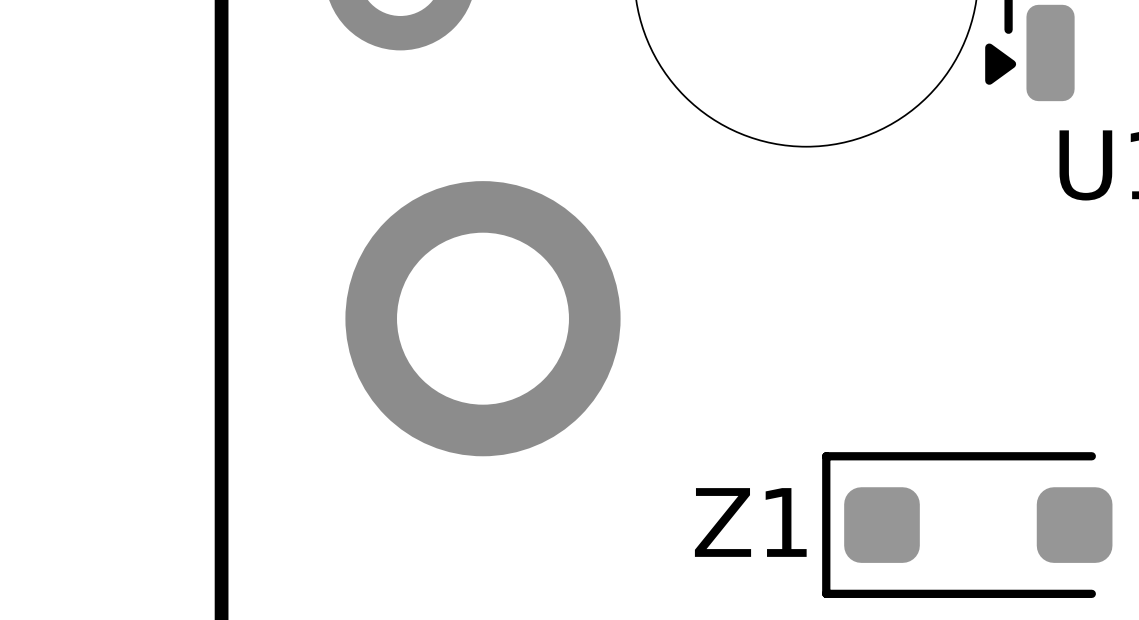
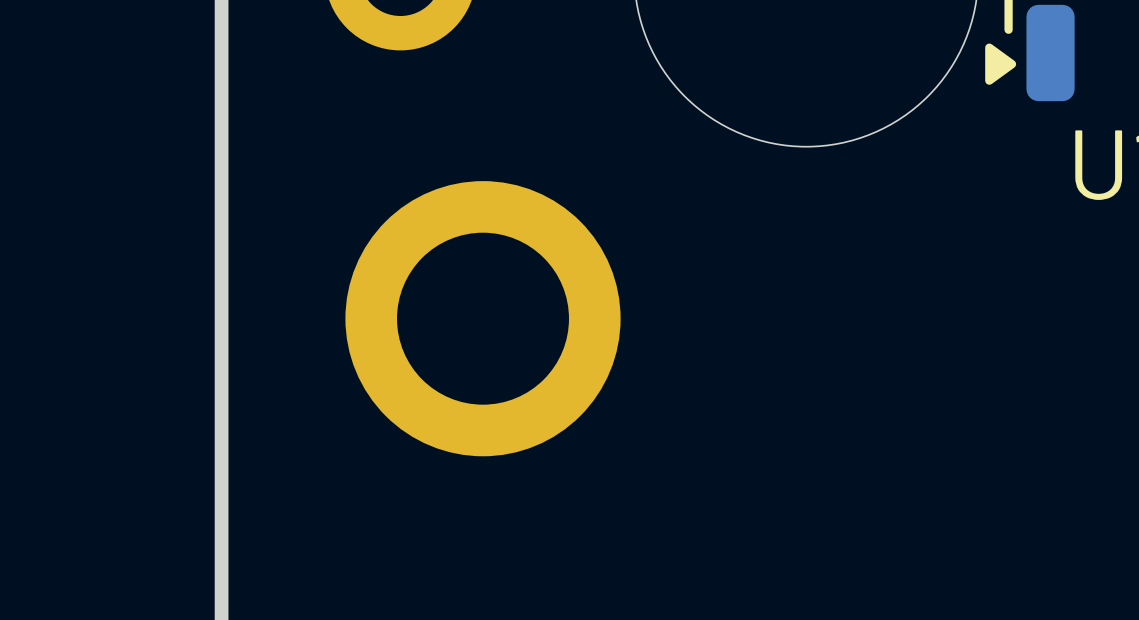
Z1: (967, 525) -> none

